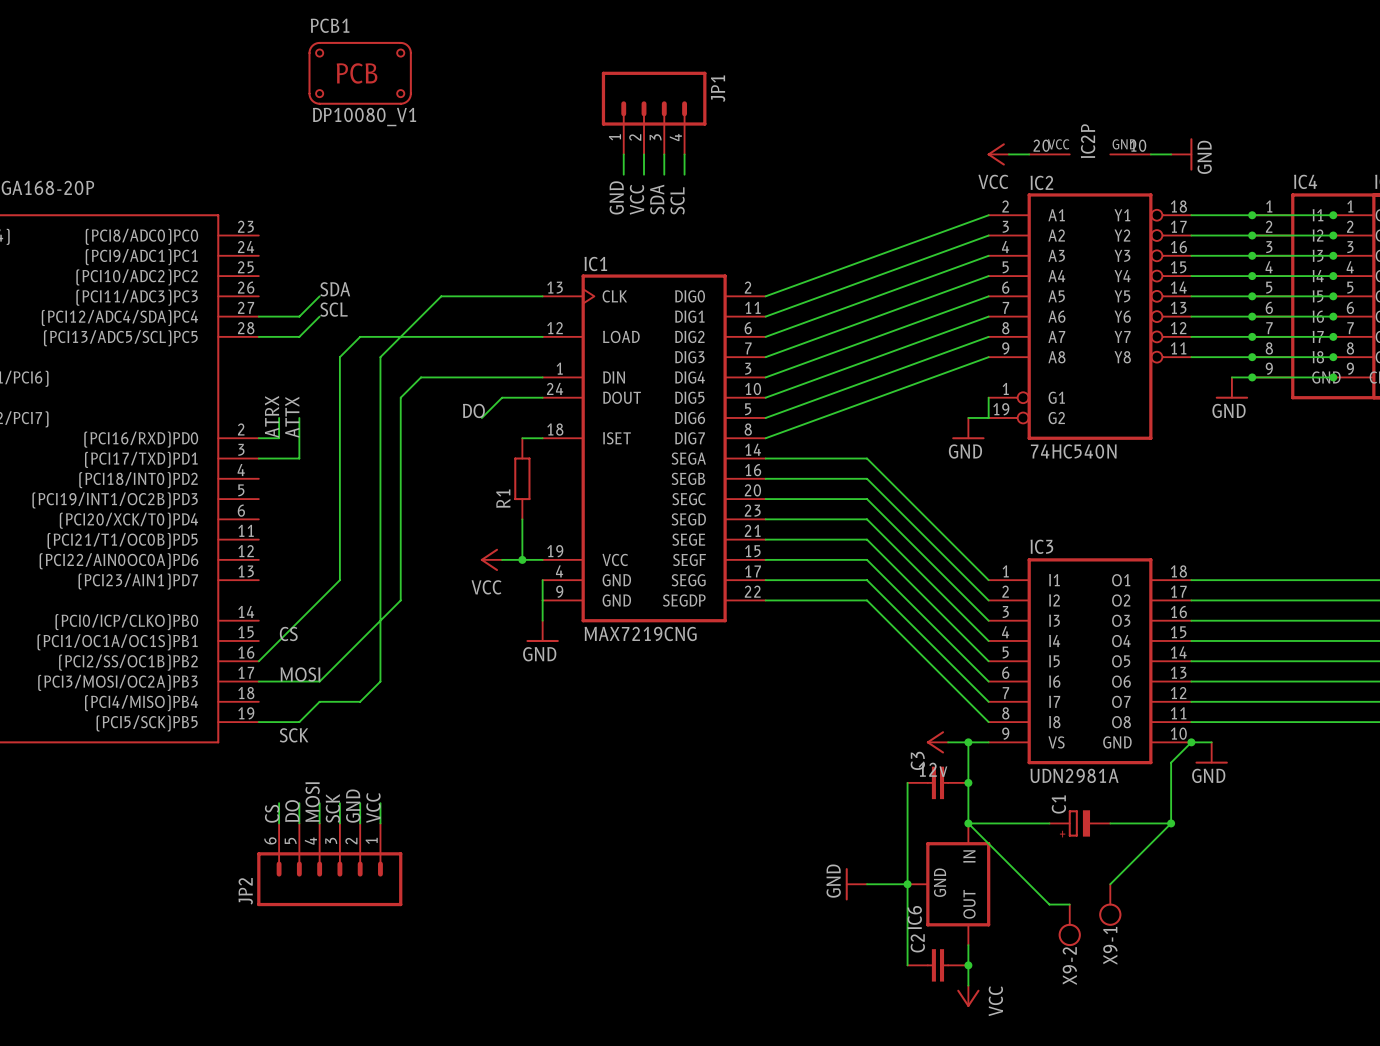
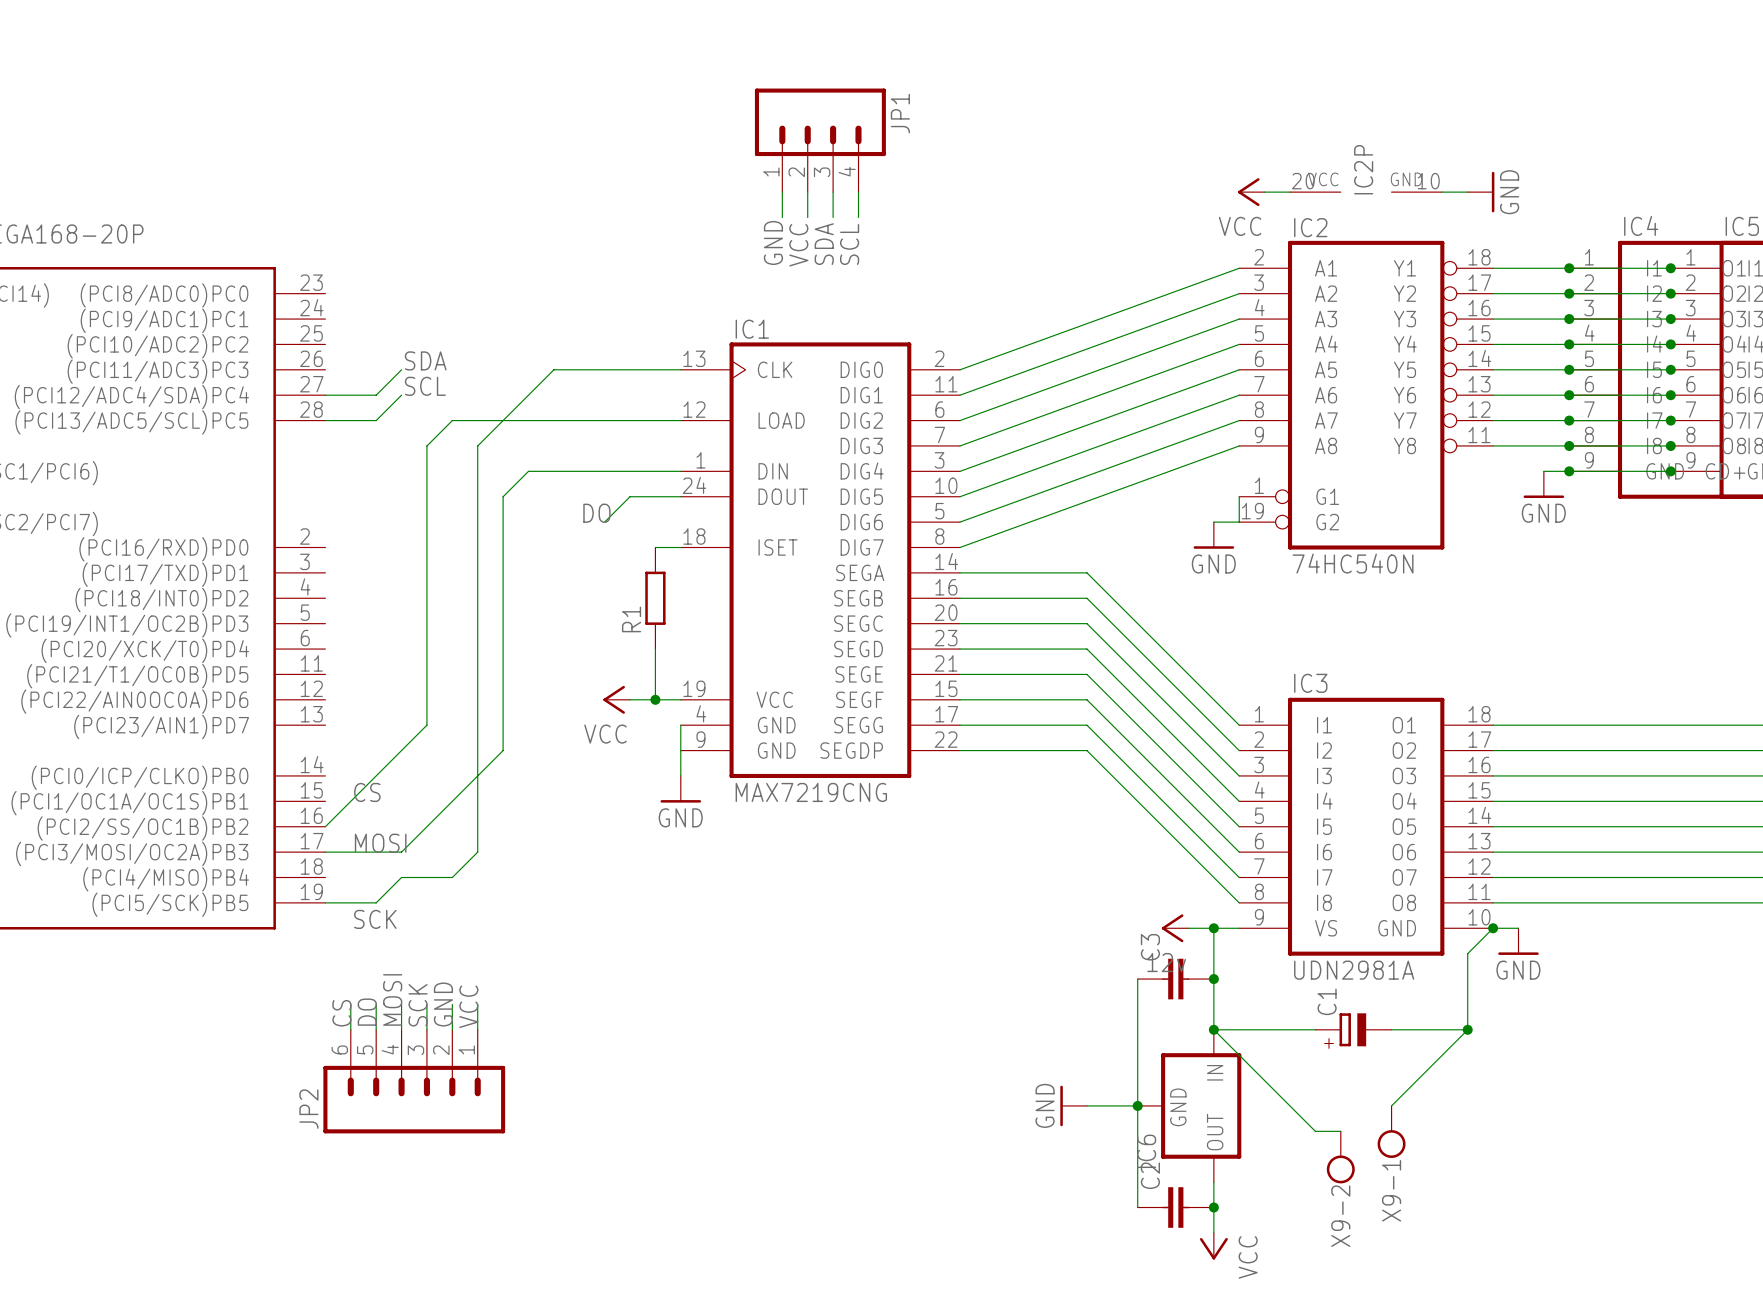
PCB1: (360, 73) -> none
label: ATRX (271, 416) -> none
wire: (279, 417) (279, 438) (258, 438) -> none
label: ATTX (292, 417) -> none
wire: (299, 417) (299, 458) (258, 458) -> none

